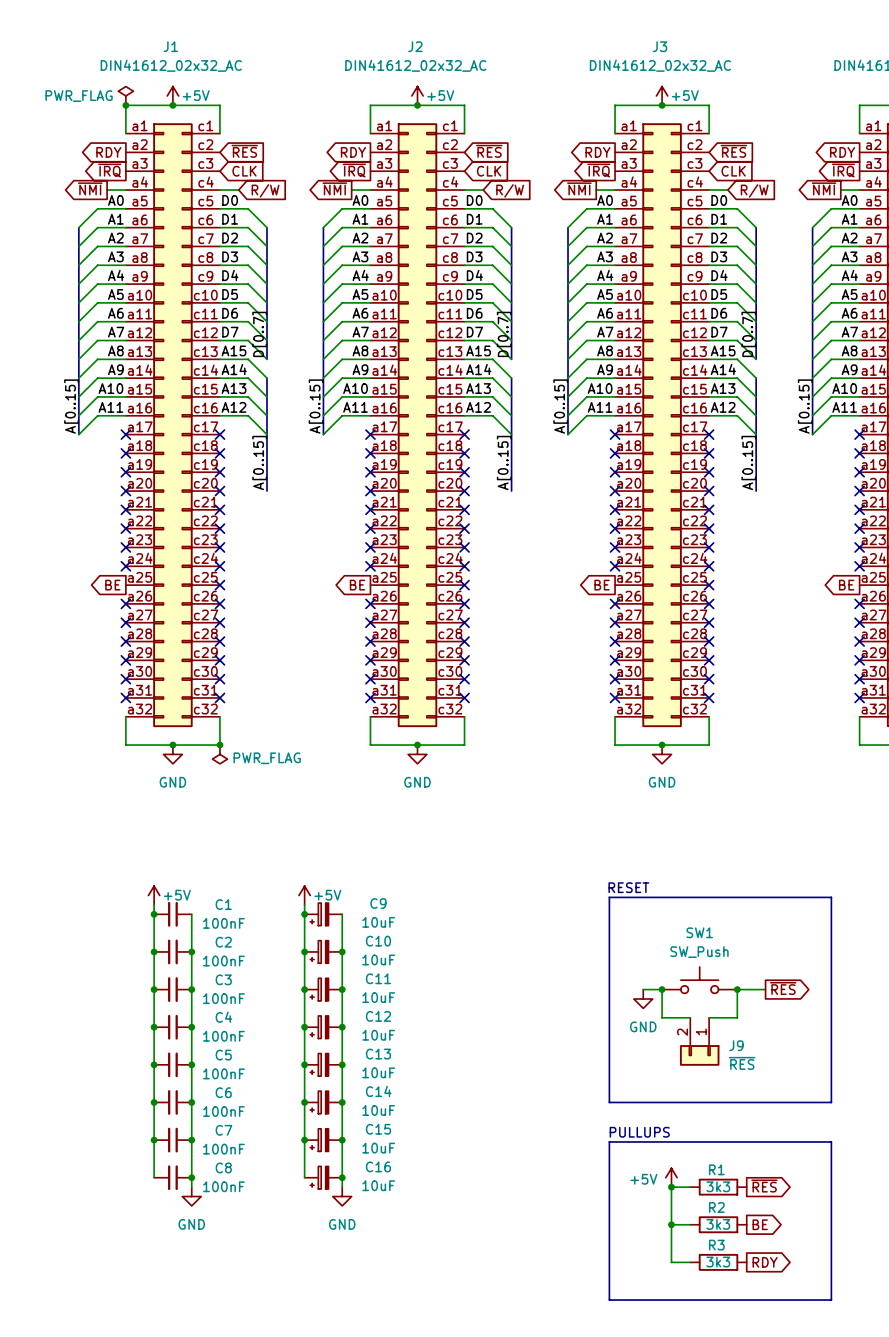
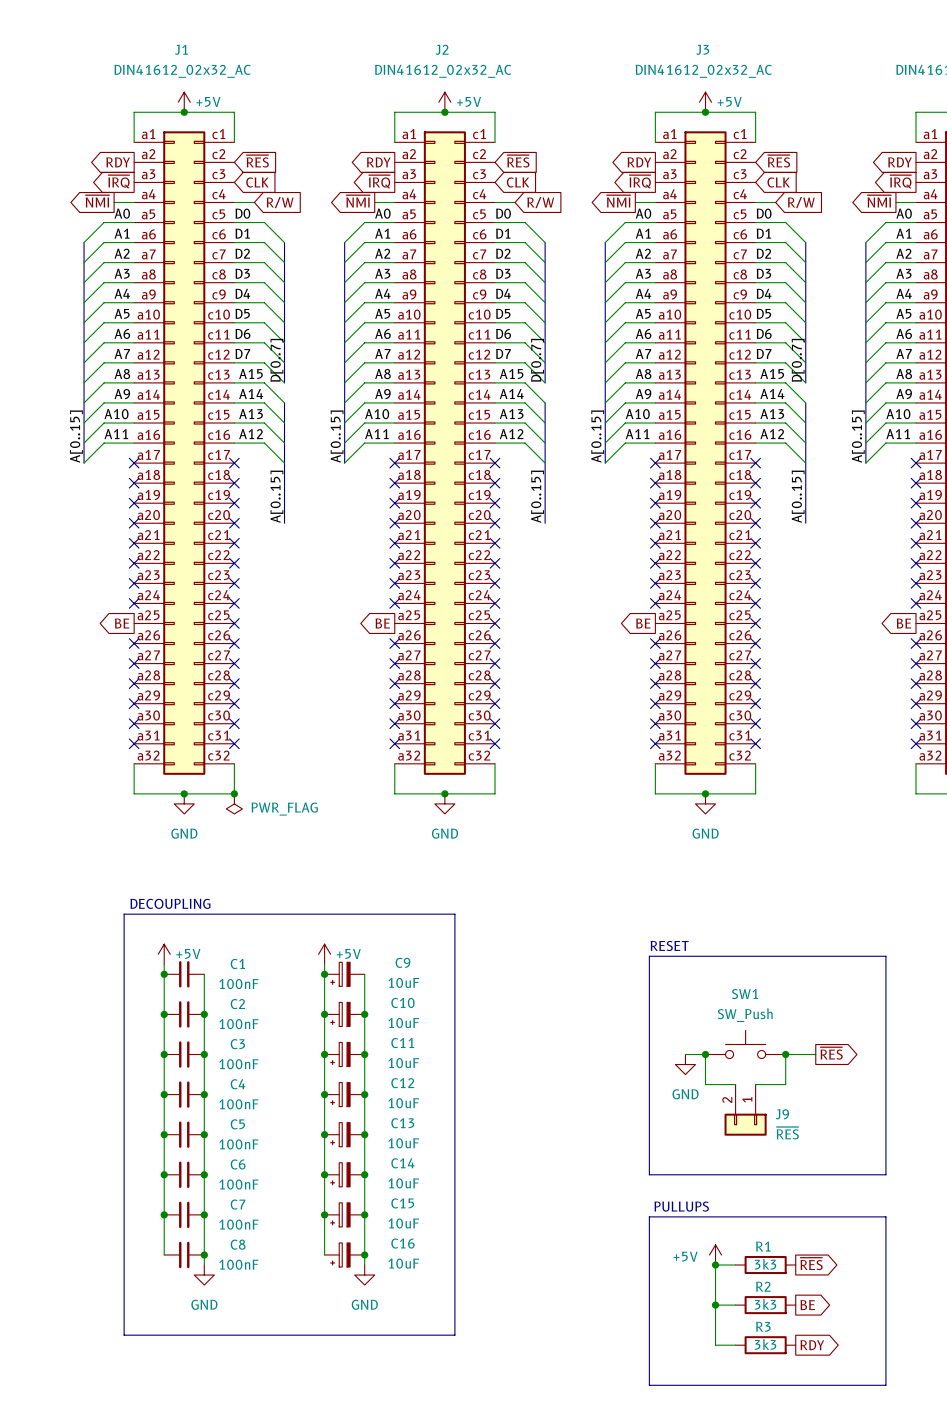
power symbol: PWR_FLAG (125, 95) -> none
junction: (125, 105) -> none
text: none -> DECOUPLING (170, 903)
line: none -> (124, 914) (454, 914) (454, 1335) (124, 1335) (124, 914)

